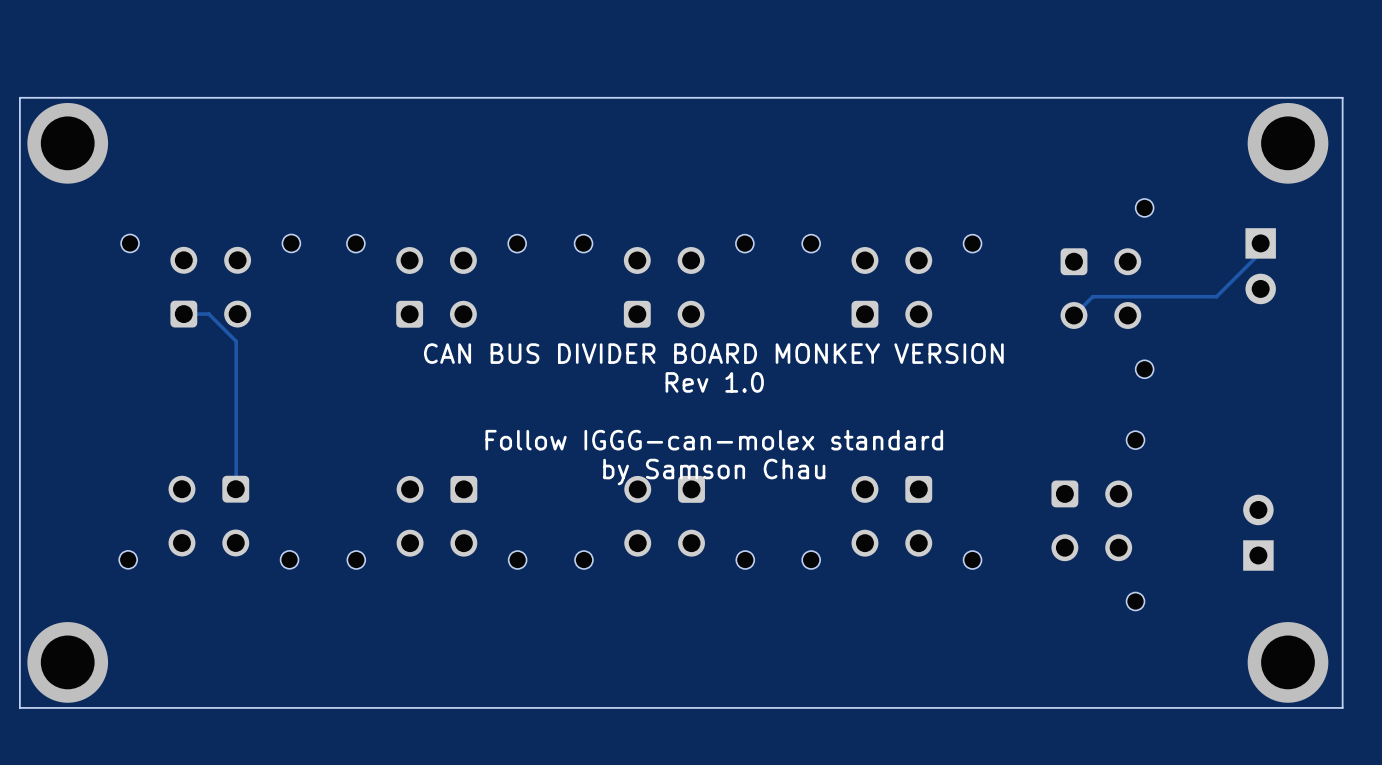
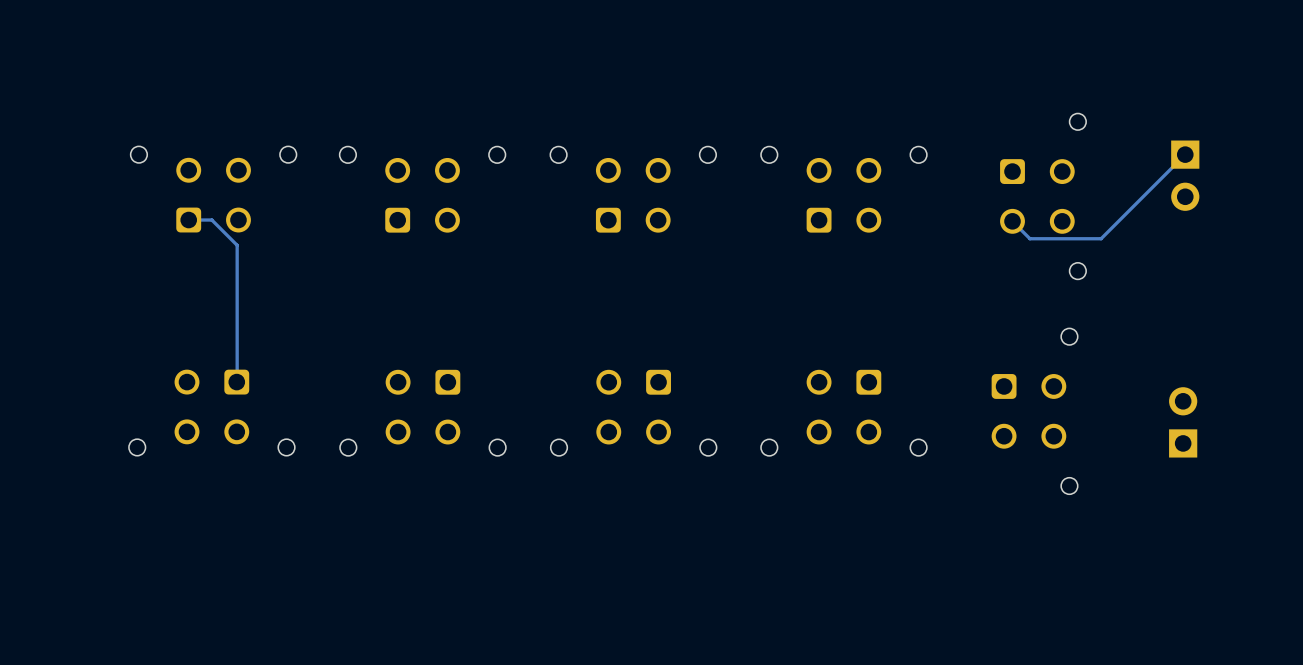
board edge: (1342, 97) (19, 97) (19, 707) (1342, 707) (1342, 97) -> none
via: (67, 143) -> none
via: (1288, 143) -> none
track: (1260, 243) (1260, 252) (1216, 296) (1092, 296) (1073, 315) -> (1185, 154) (1101, 238) (1029, 238) (1012, 221)
text: CAN BUS DIVIDER BOARD MONKEY VERSION (713, 353) -> none
text: Rev 1.0 (714, 382) -> none
text: Follow IGGG-can-molex standard (714, 440) -> none
text: by Samson Chau (714, 472) -> none
via: (67, 662) -> none
via: (1288, 662) -> none

